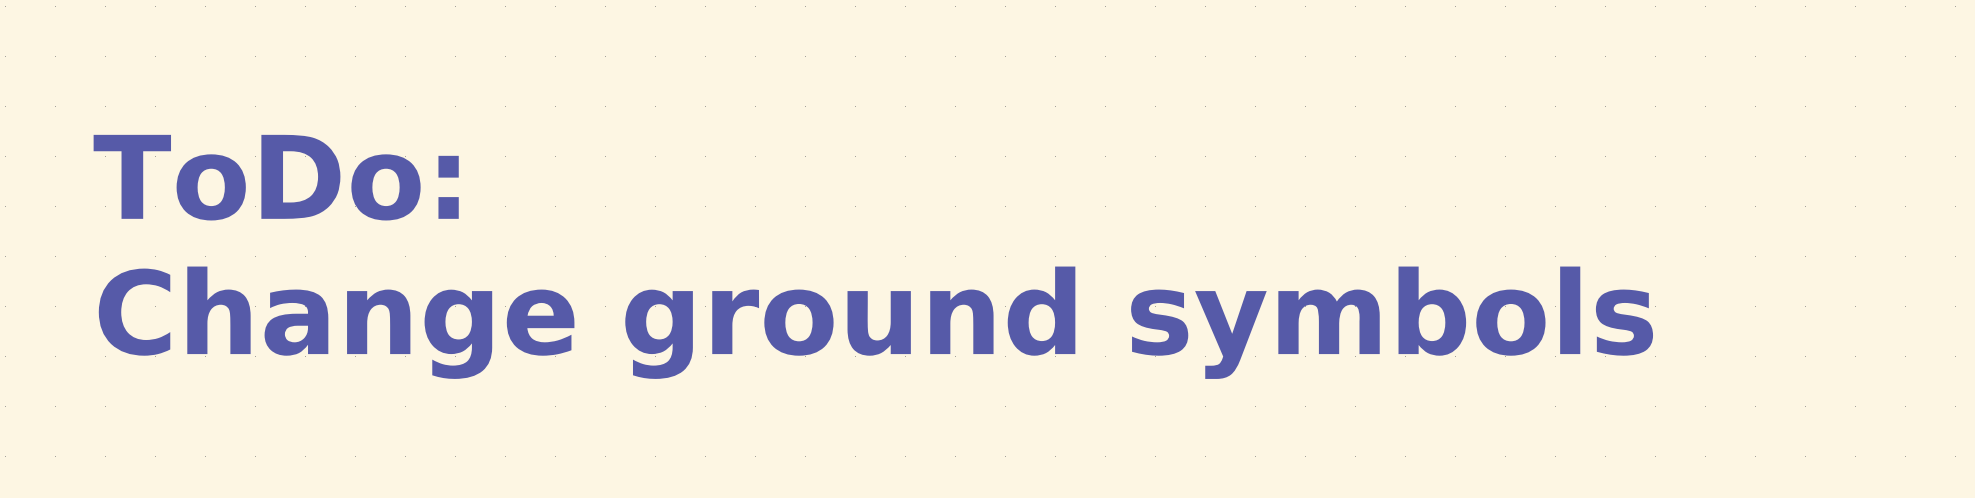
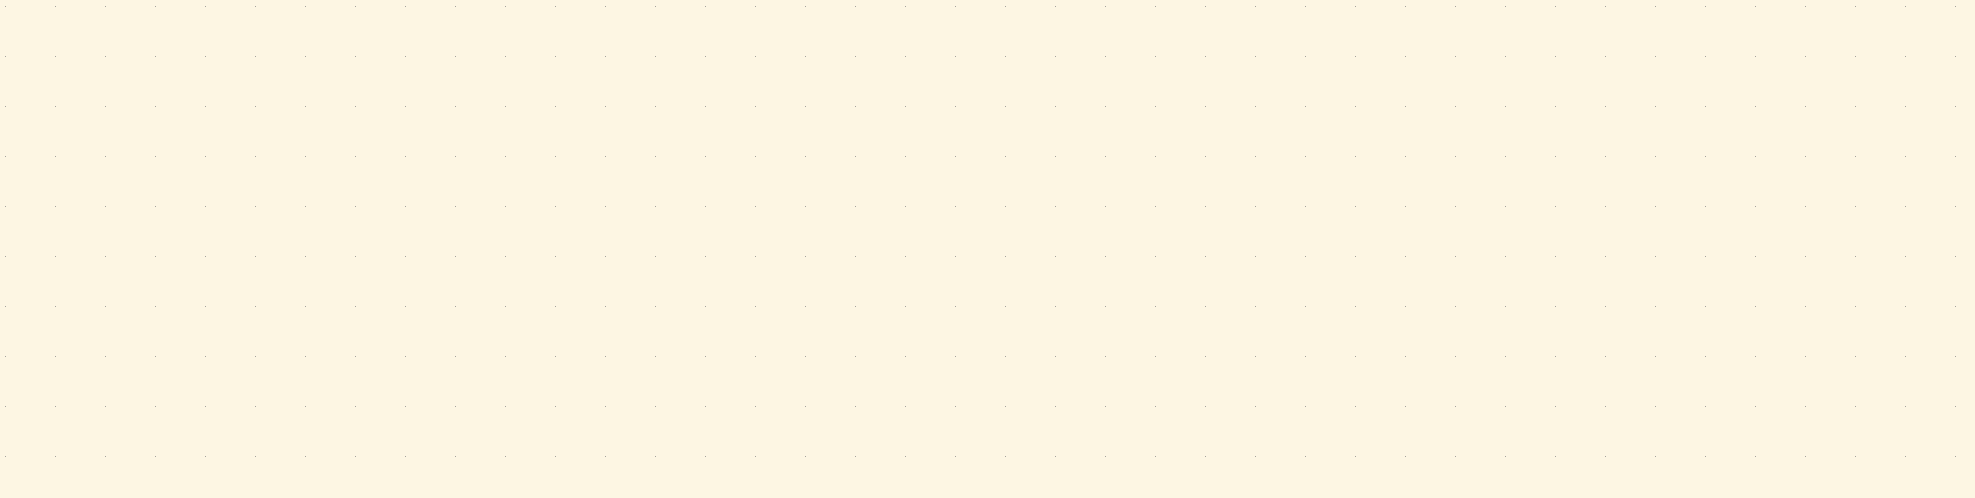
text: ToDo: (276, 177) -> none
text: Change ground symbols (875, 322) -> none

